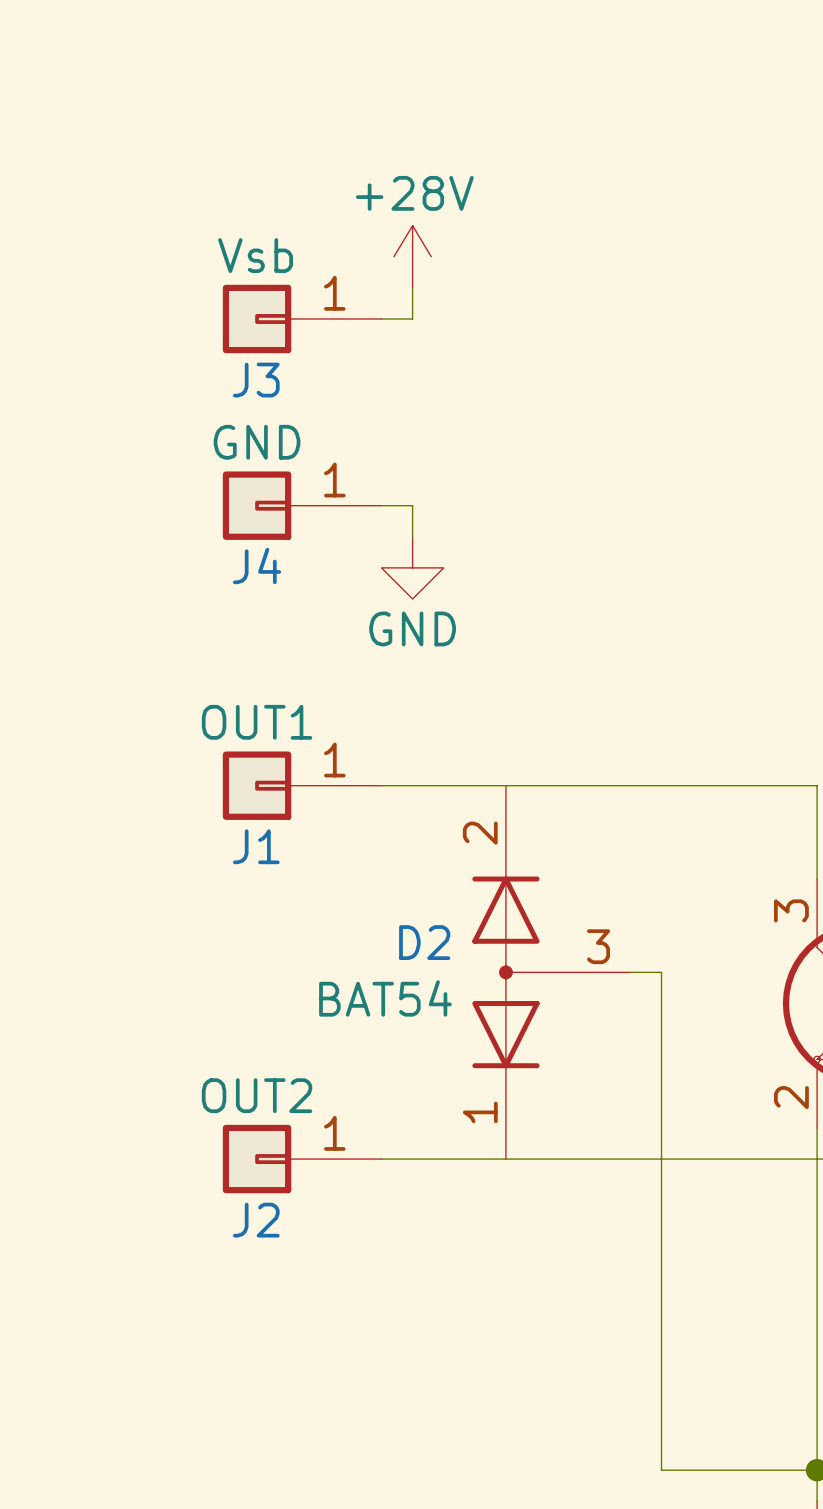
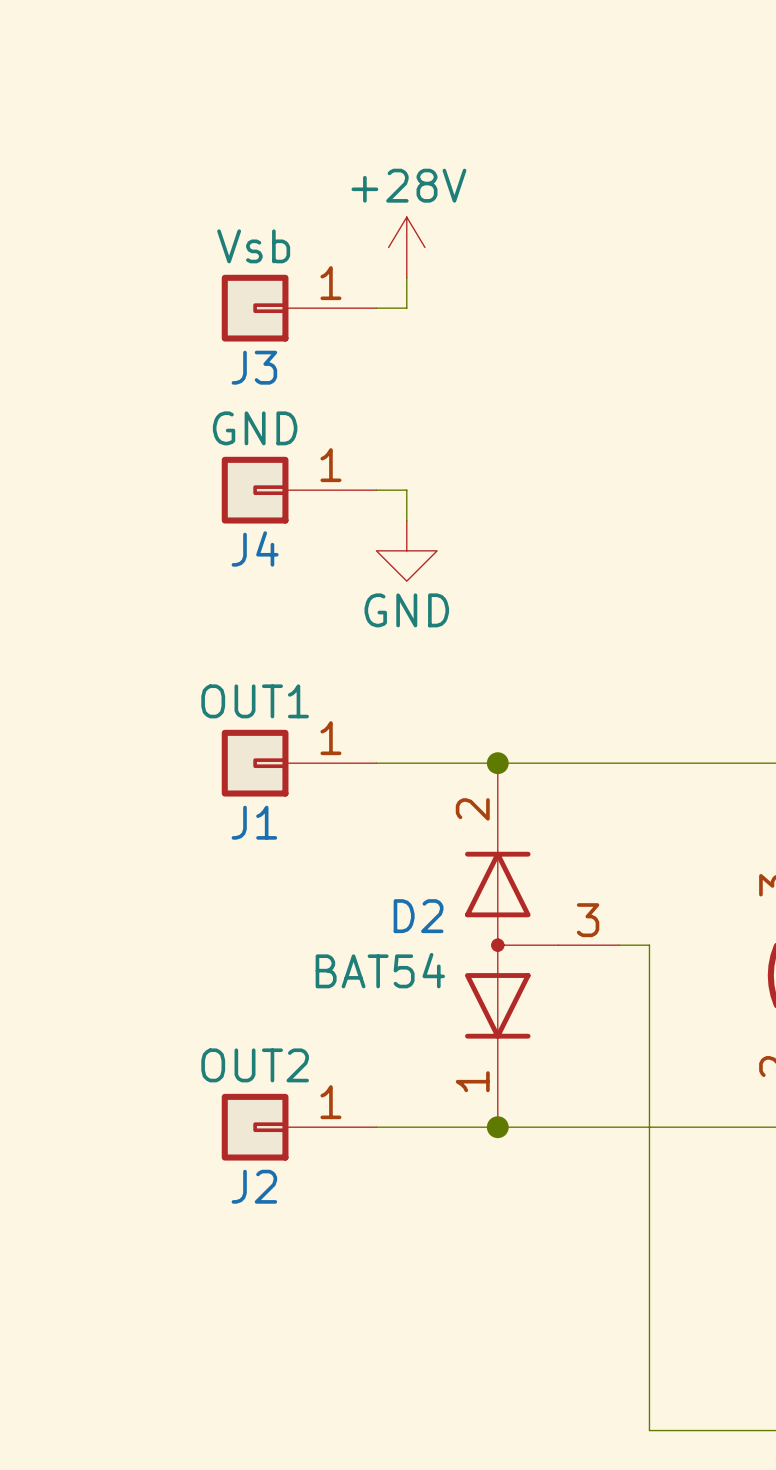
junction: none -> (497, 763)
junction: none -> (497, 1127)

